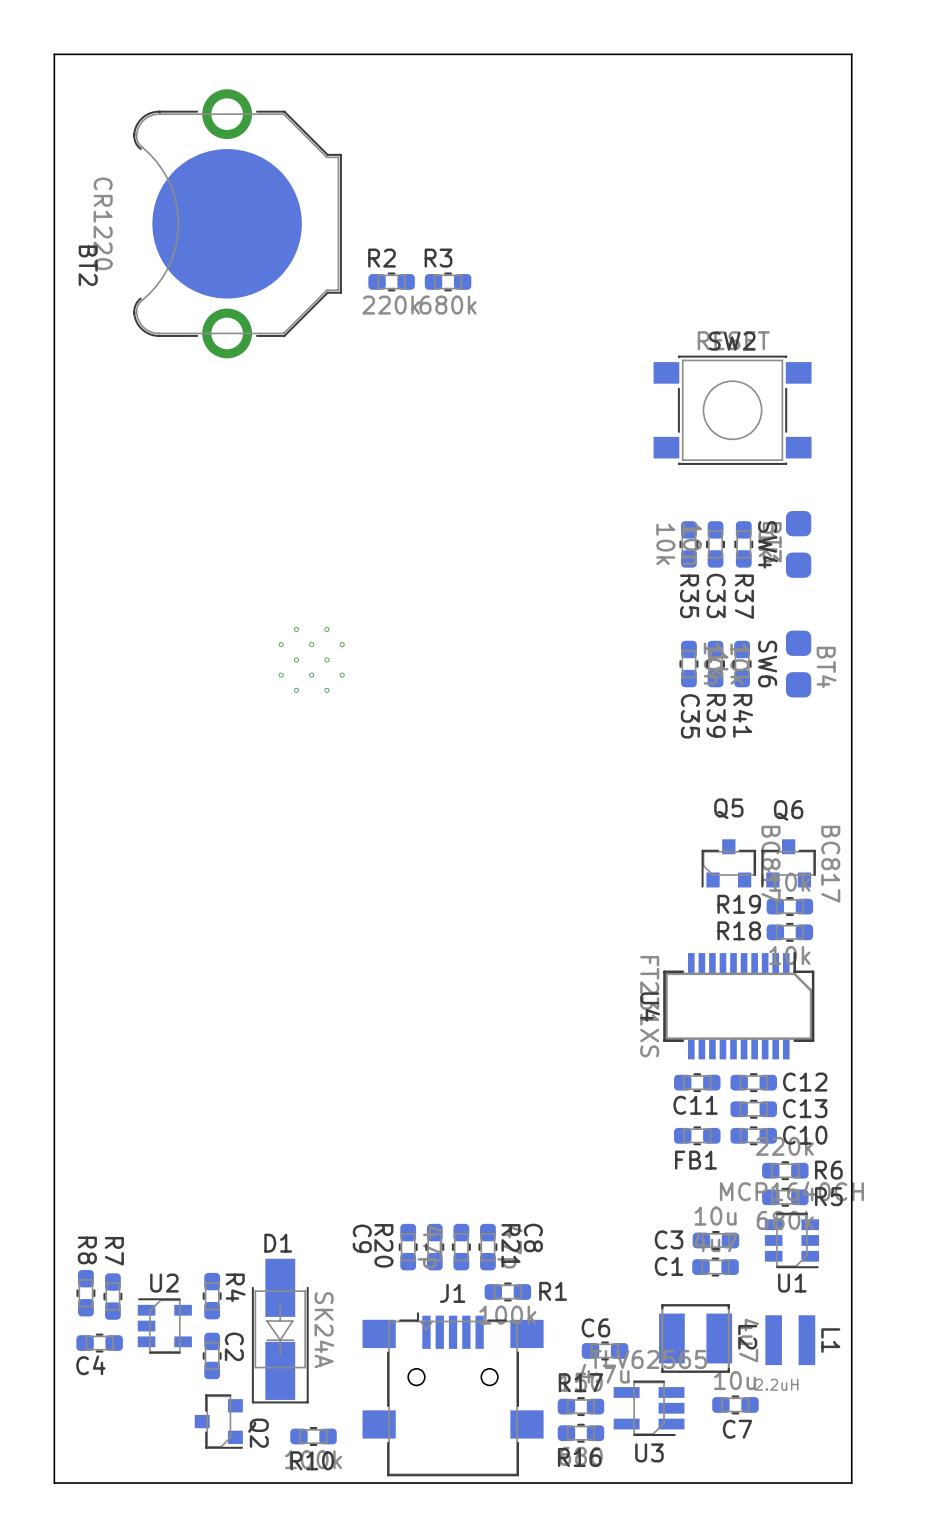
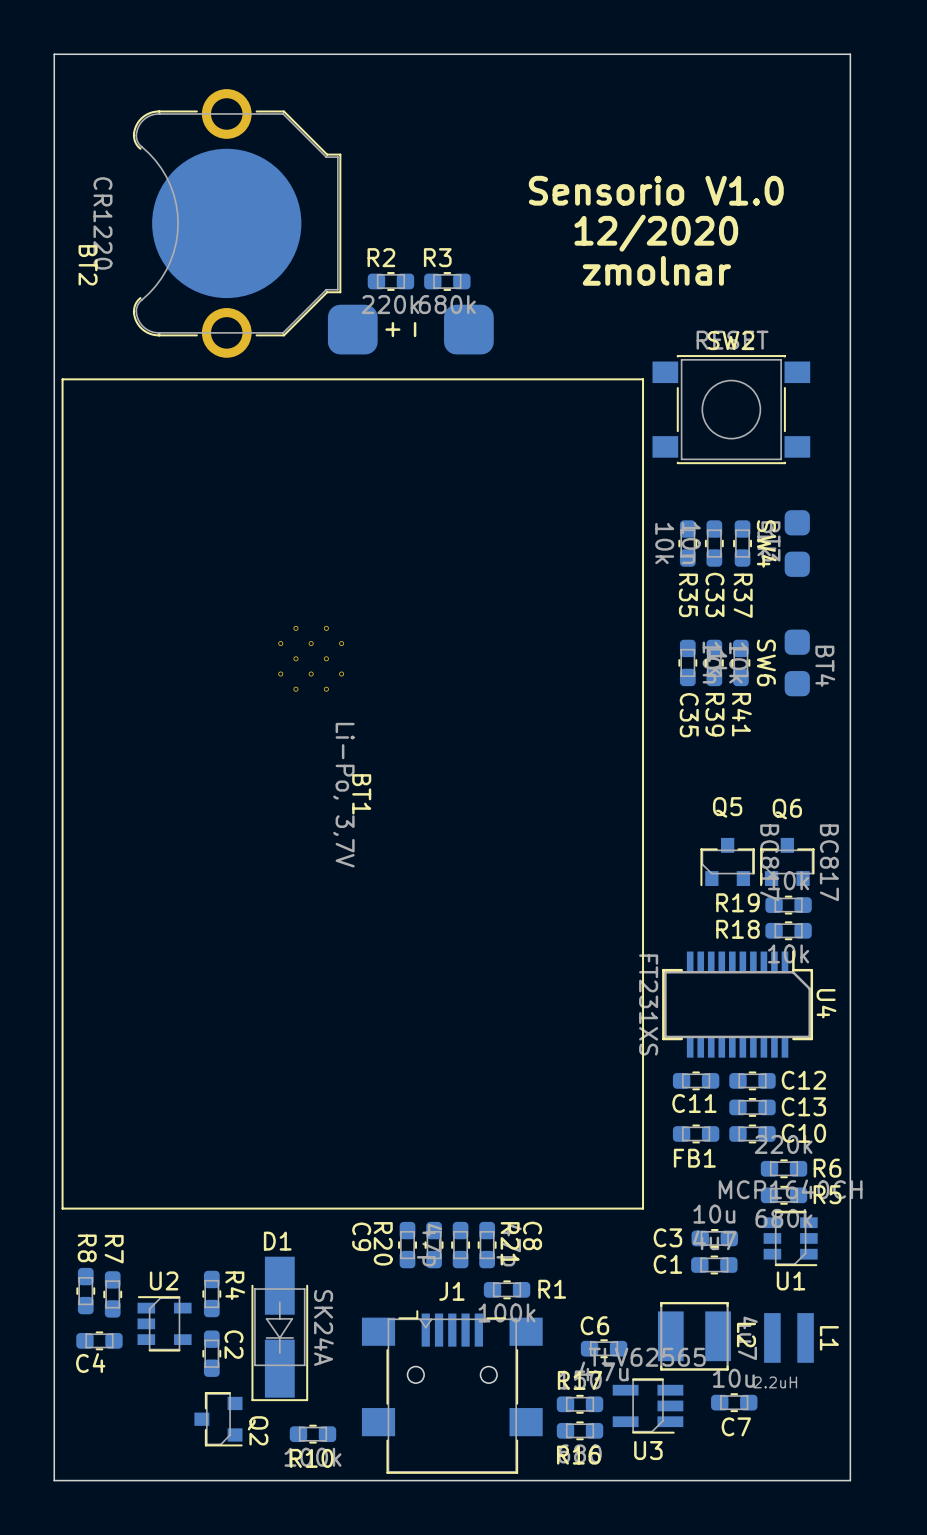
text: none -> Sensorio V1.0 (656, 190)
text: none -> 12/2020 (656, 233)
text: none -> zmolnar (656, 270)
BT1: none -> Li-Po, 3,7V (352, 757)
U4 name position: U4 (650, 1007) -> U4 (826, 1003)

